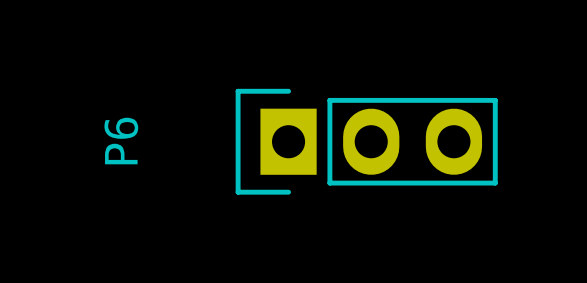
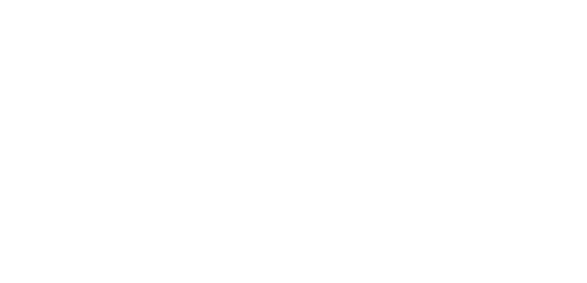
P6: (366, 141) -> none

